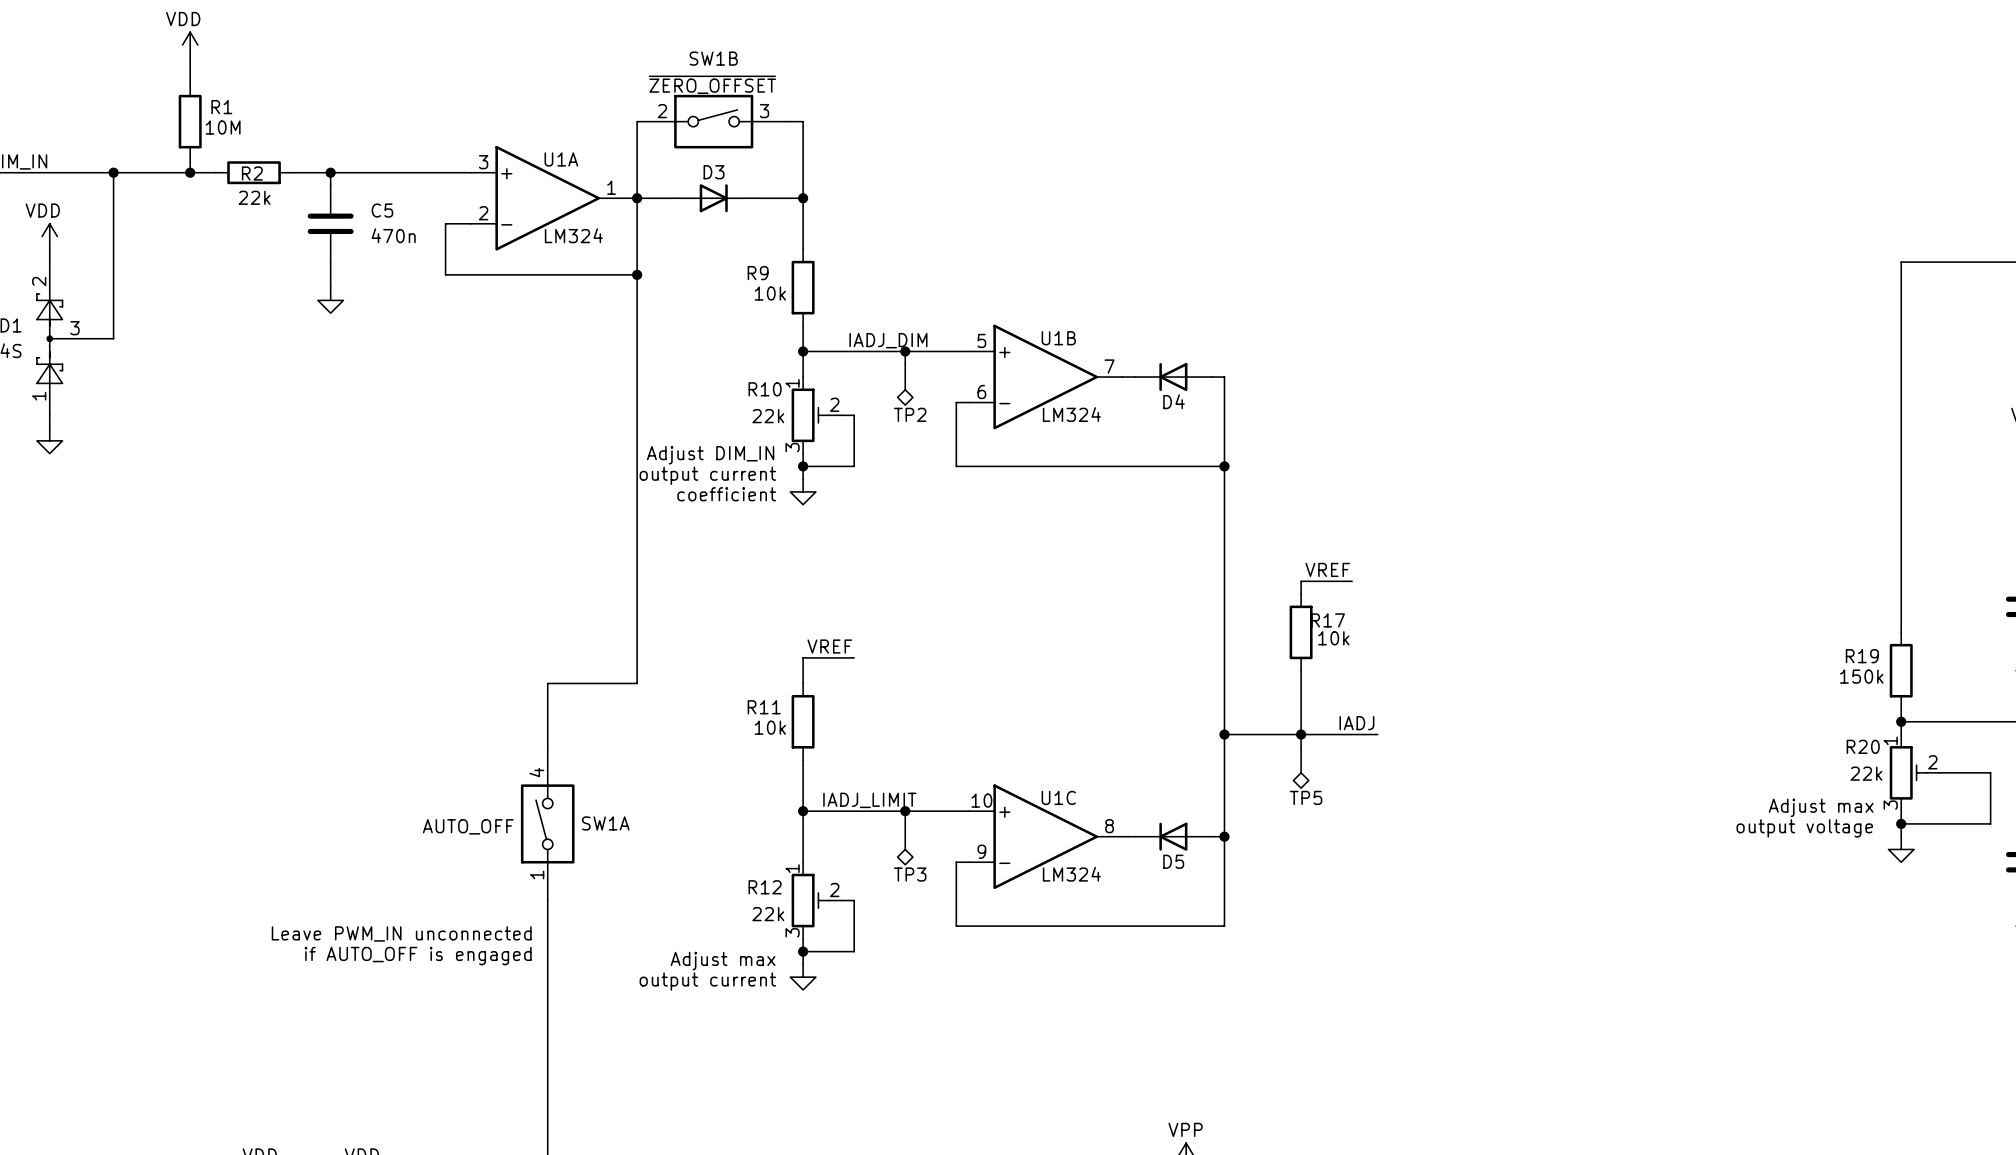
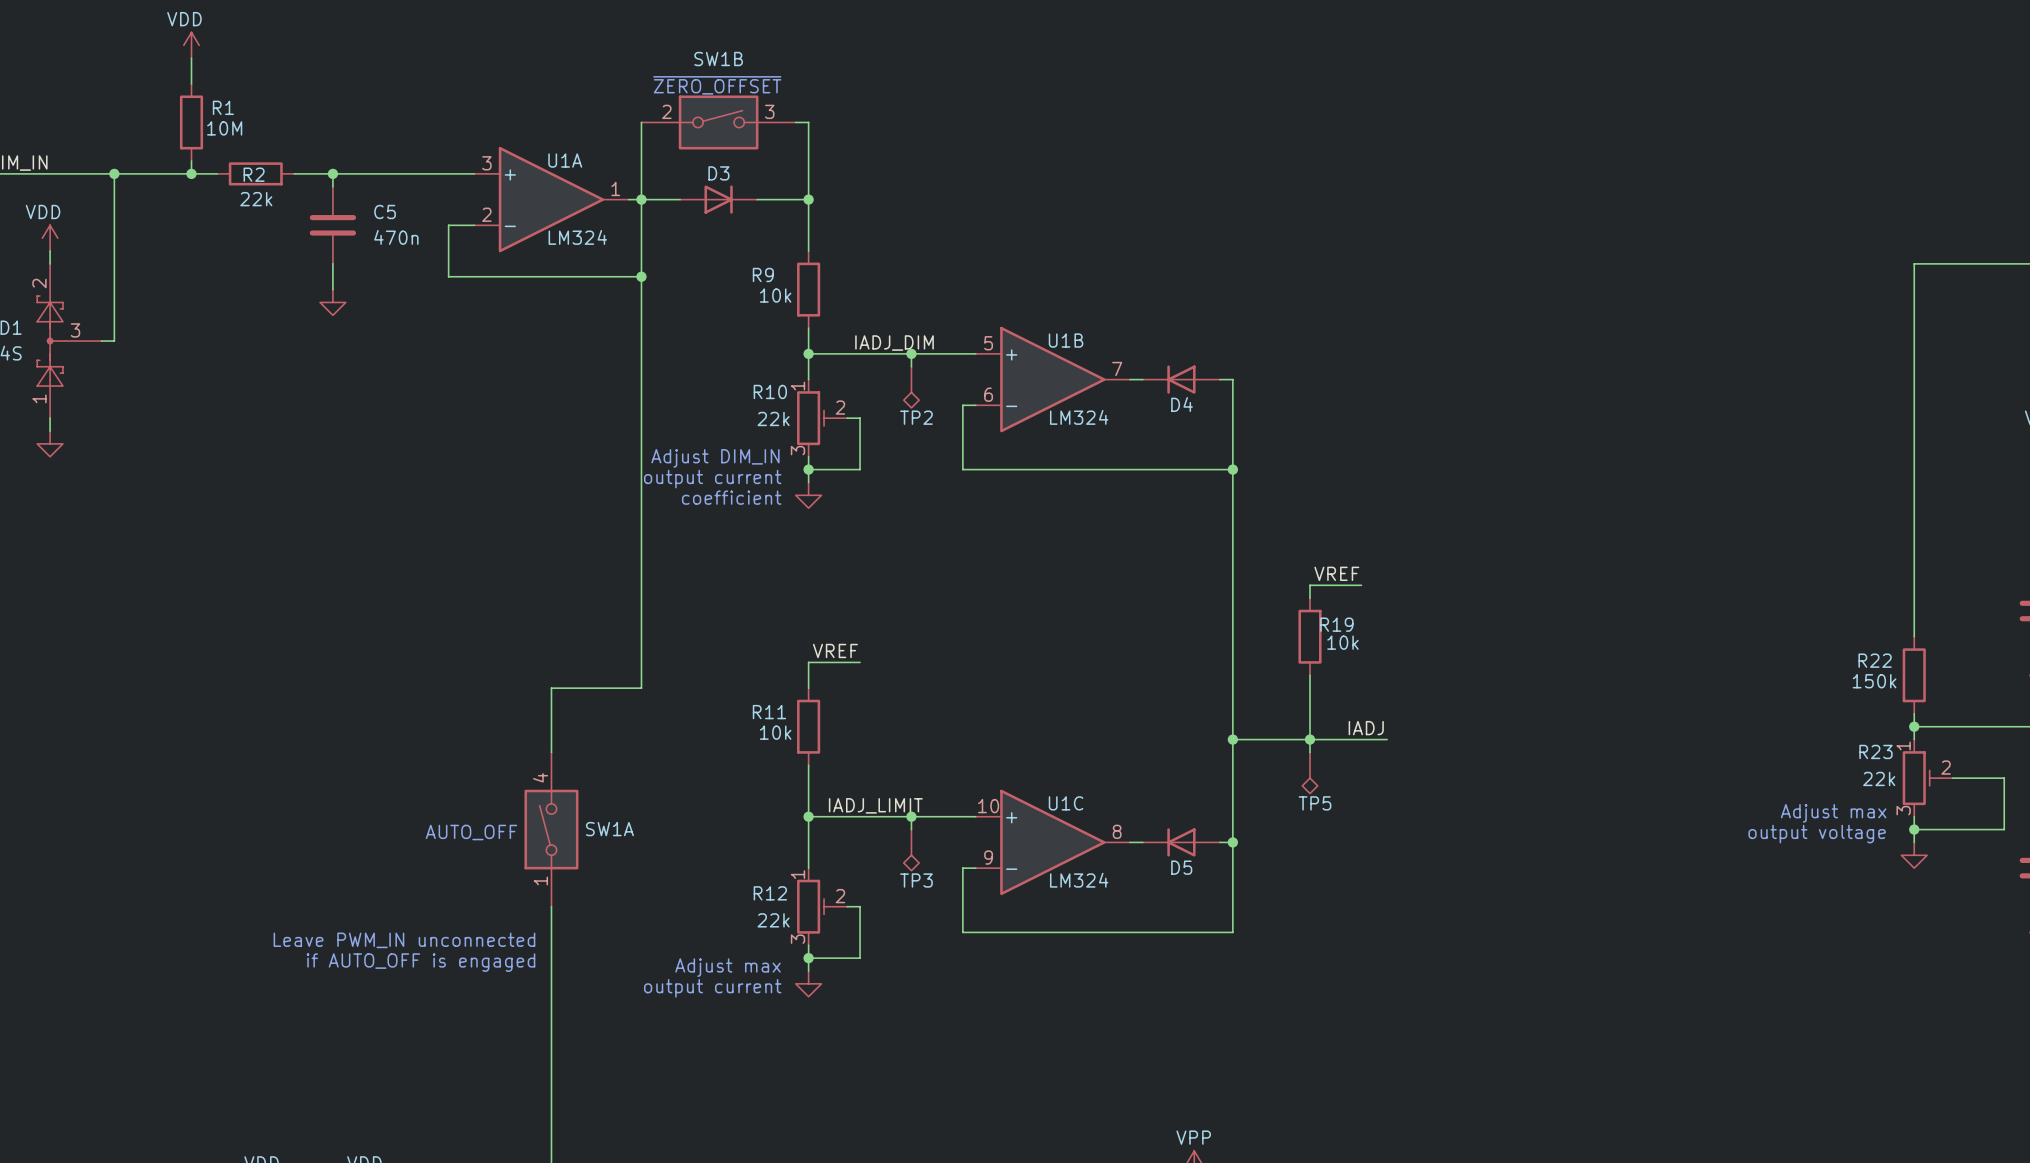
R17 name: R17 (1328, 620) -> R19 (1336, 624)
R19 name: R19 (1862, 656) -> R22 (1875, 660)
R20 name: R20 (1863, 746) -> R23 (1875, 751)

